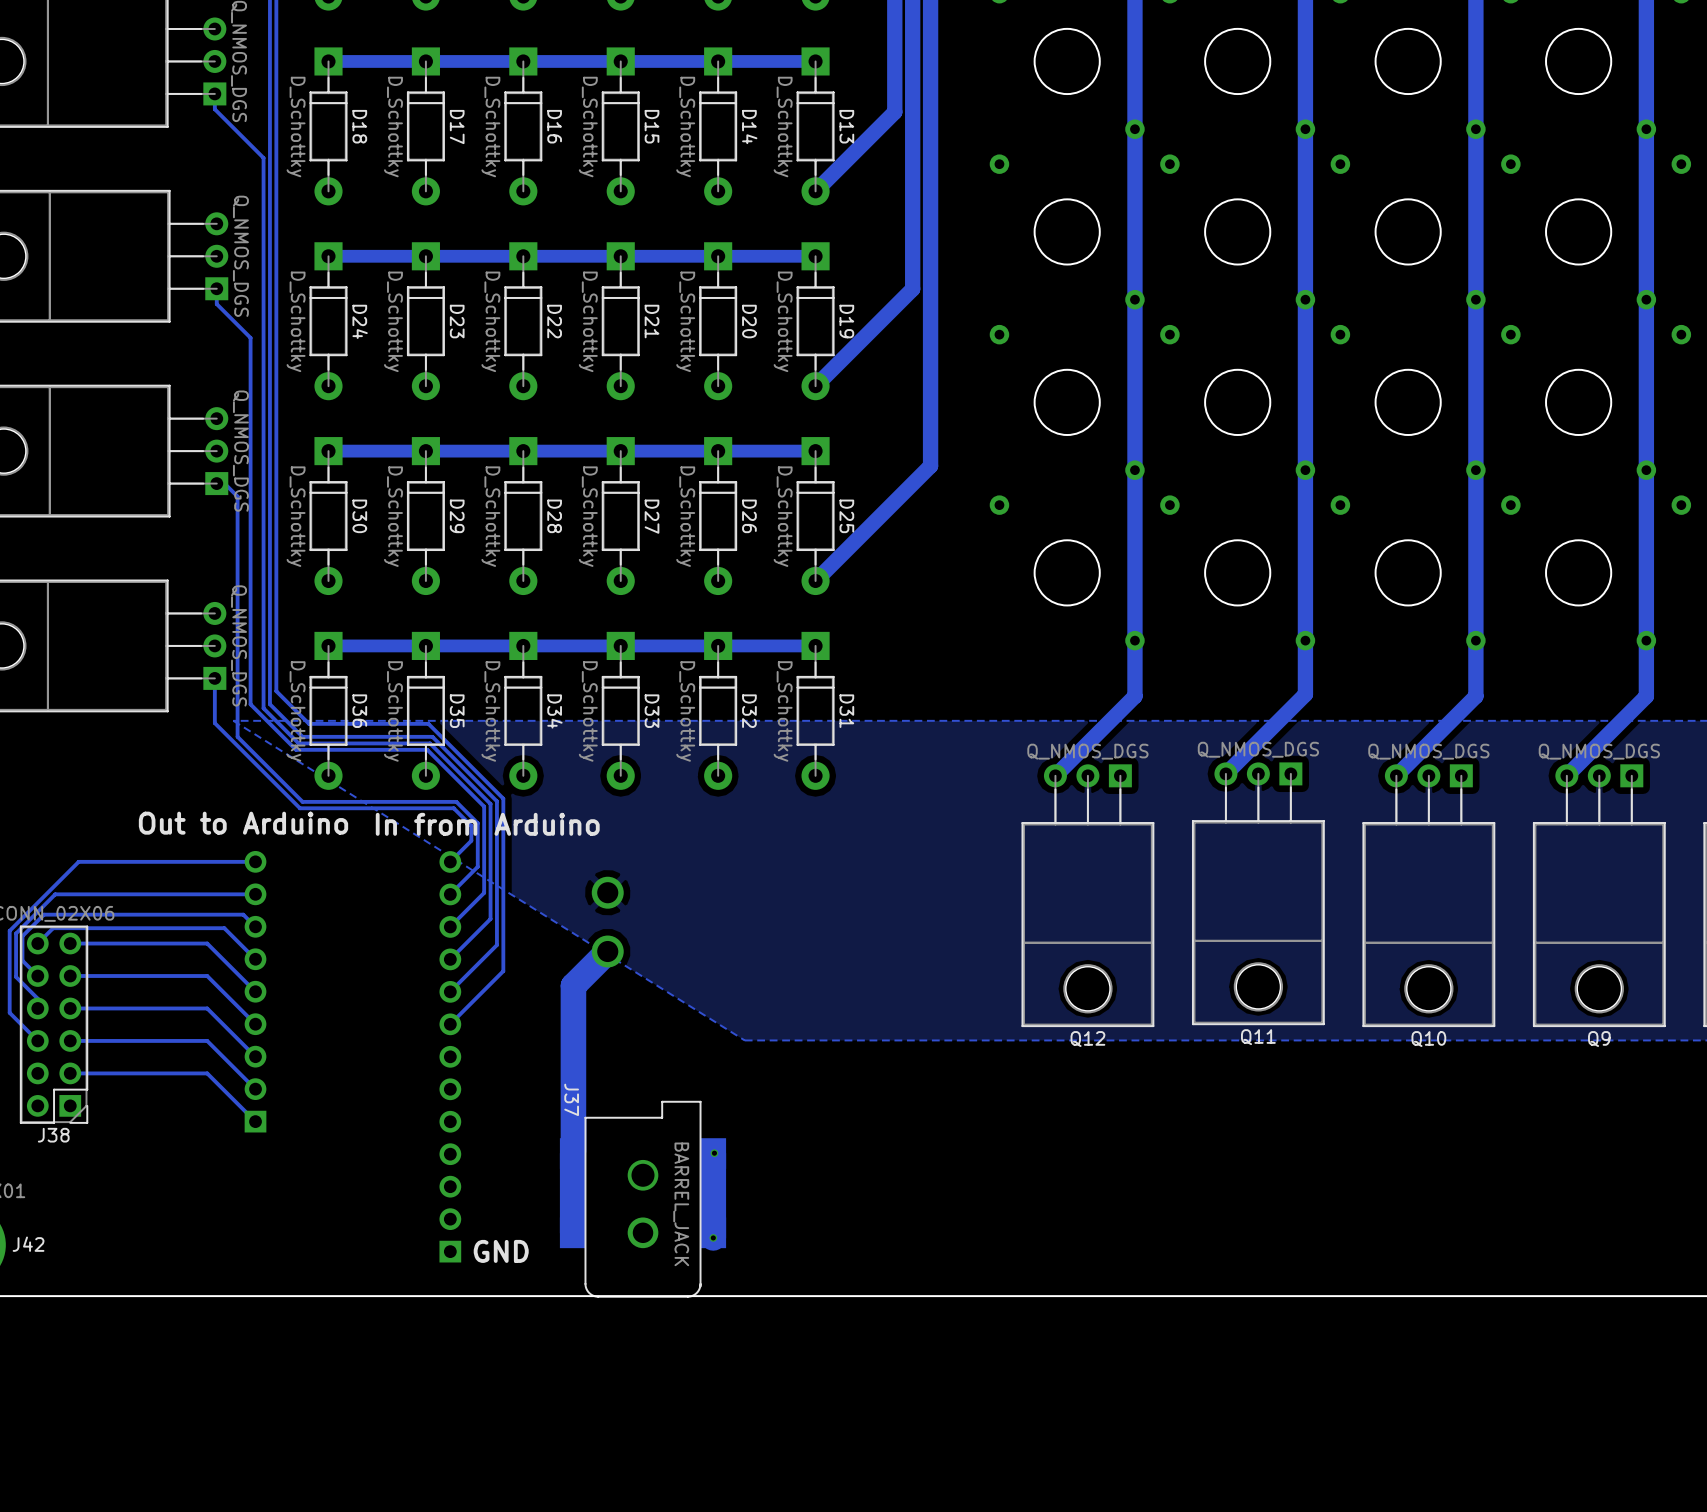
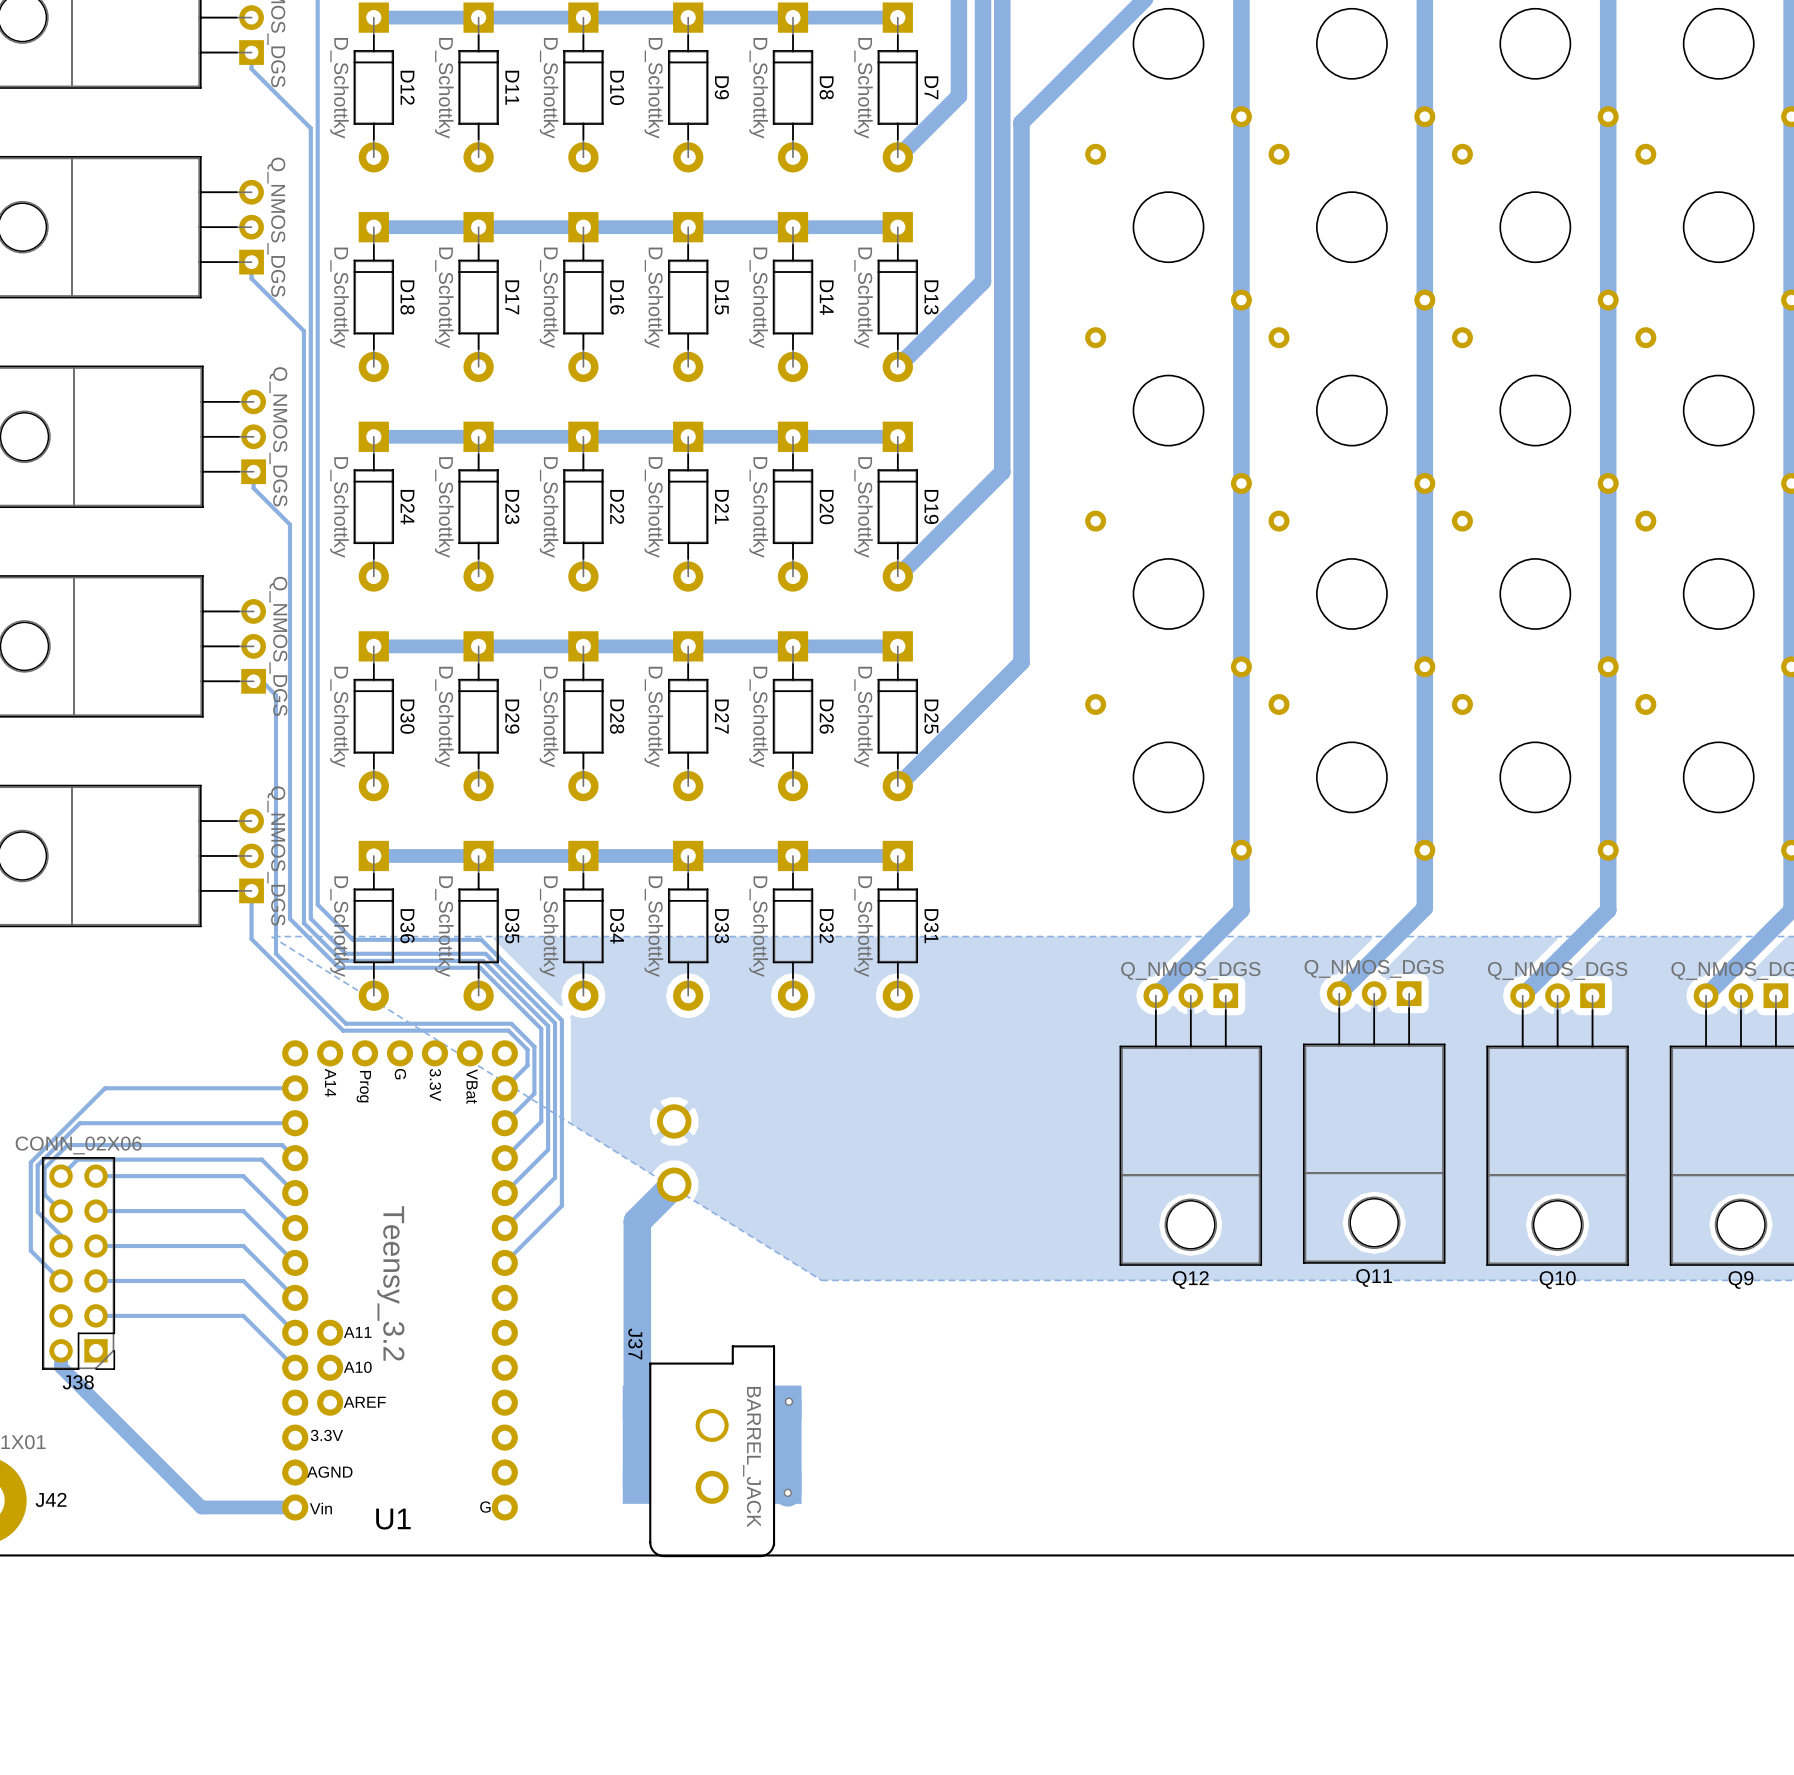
text: Out to Arduino (243, 823) -> none
text: In from Arduino (487, 824) -> none
part: (255, 991) -> none
U1: none -> Teensy_3.2 (400, 1280)
part: (450, 1056) -> none
track: none -> (61, 1350) (61, 1367) (201, 1507) (295, 1507)
text: GND (501, 1251) -> none

